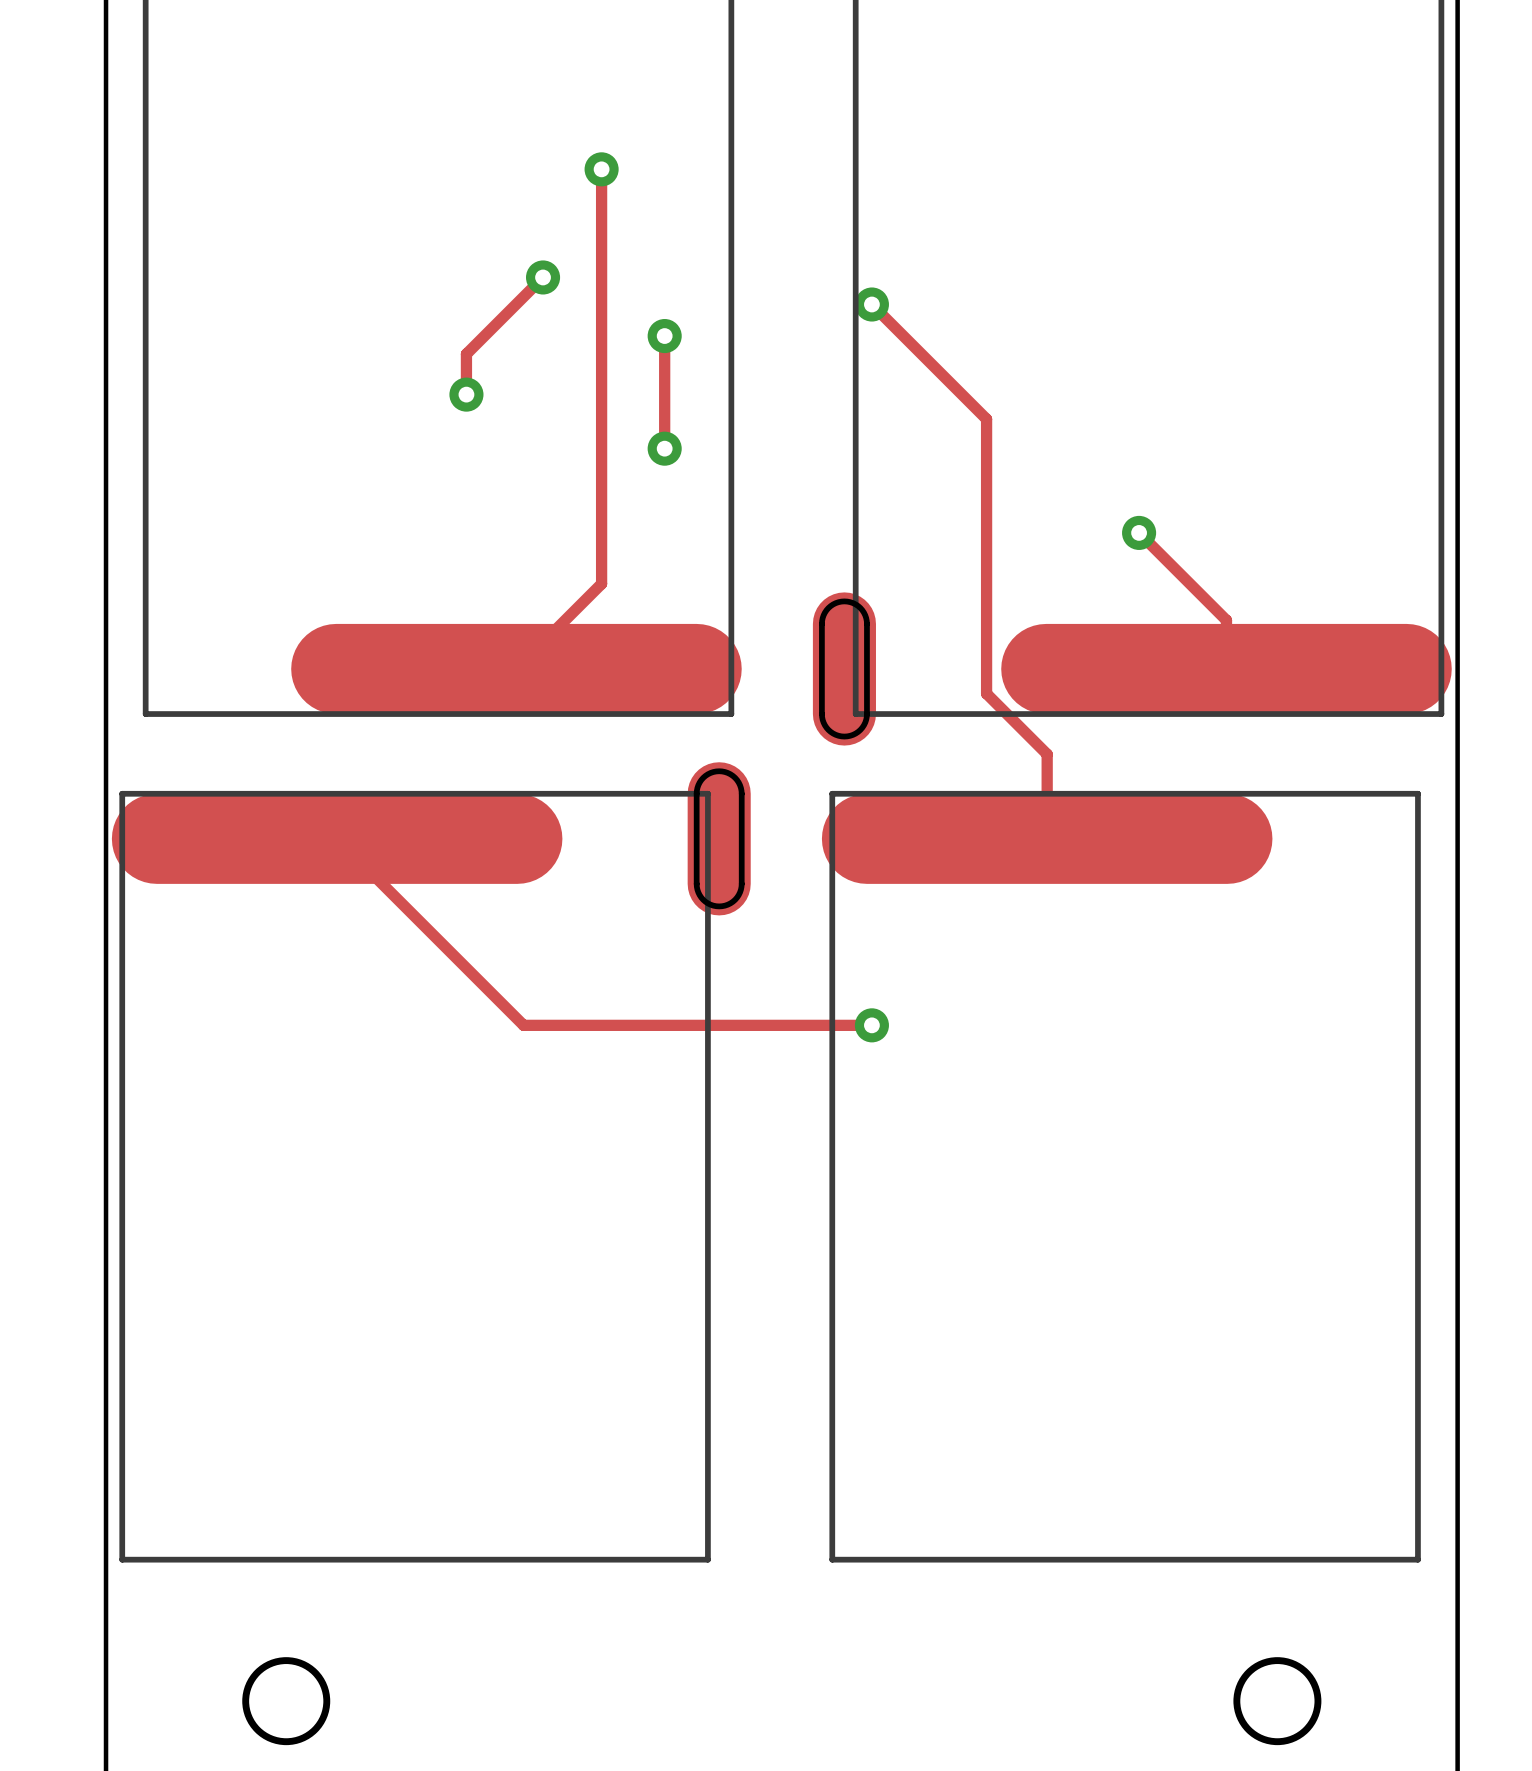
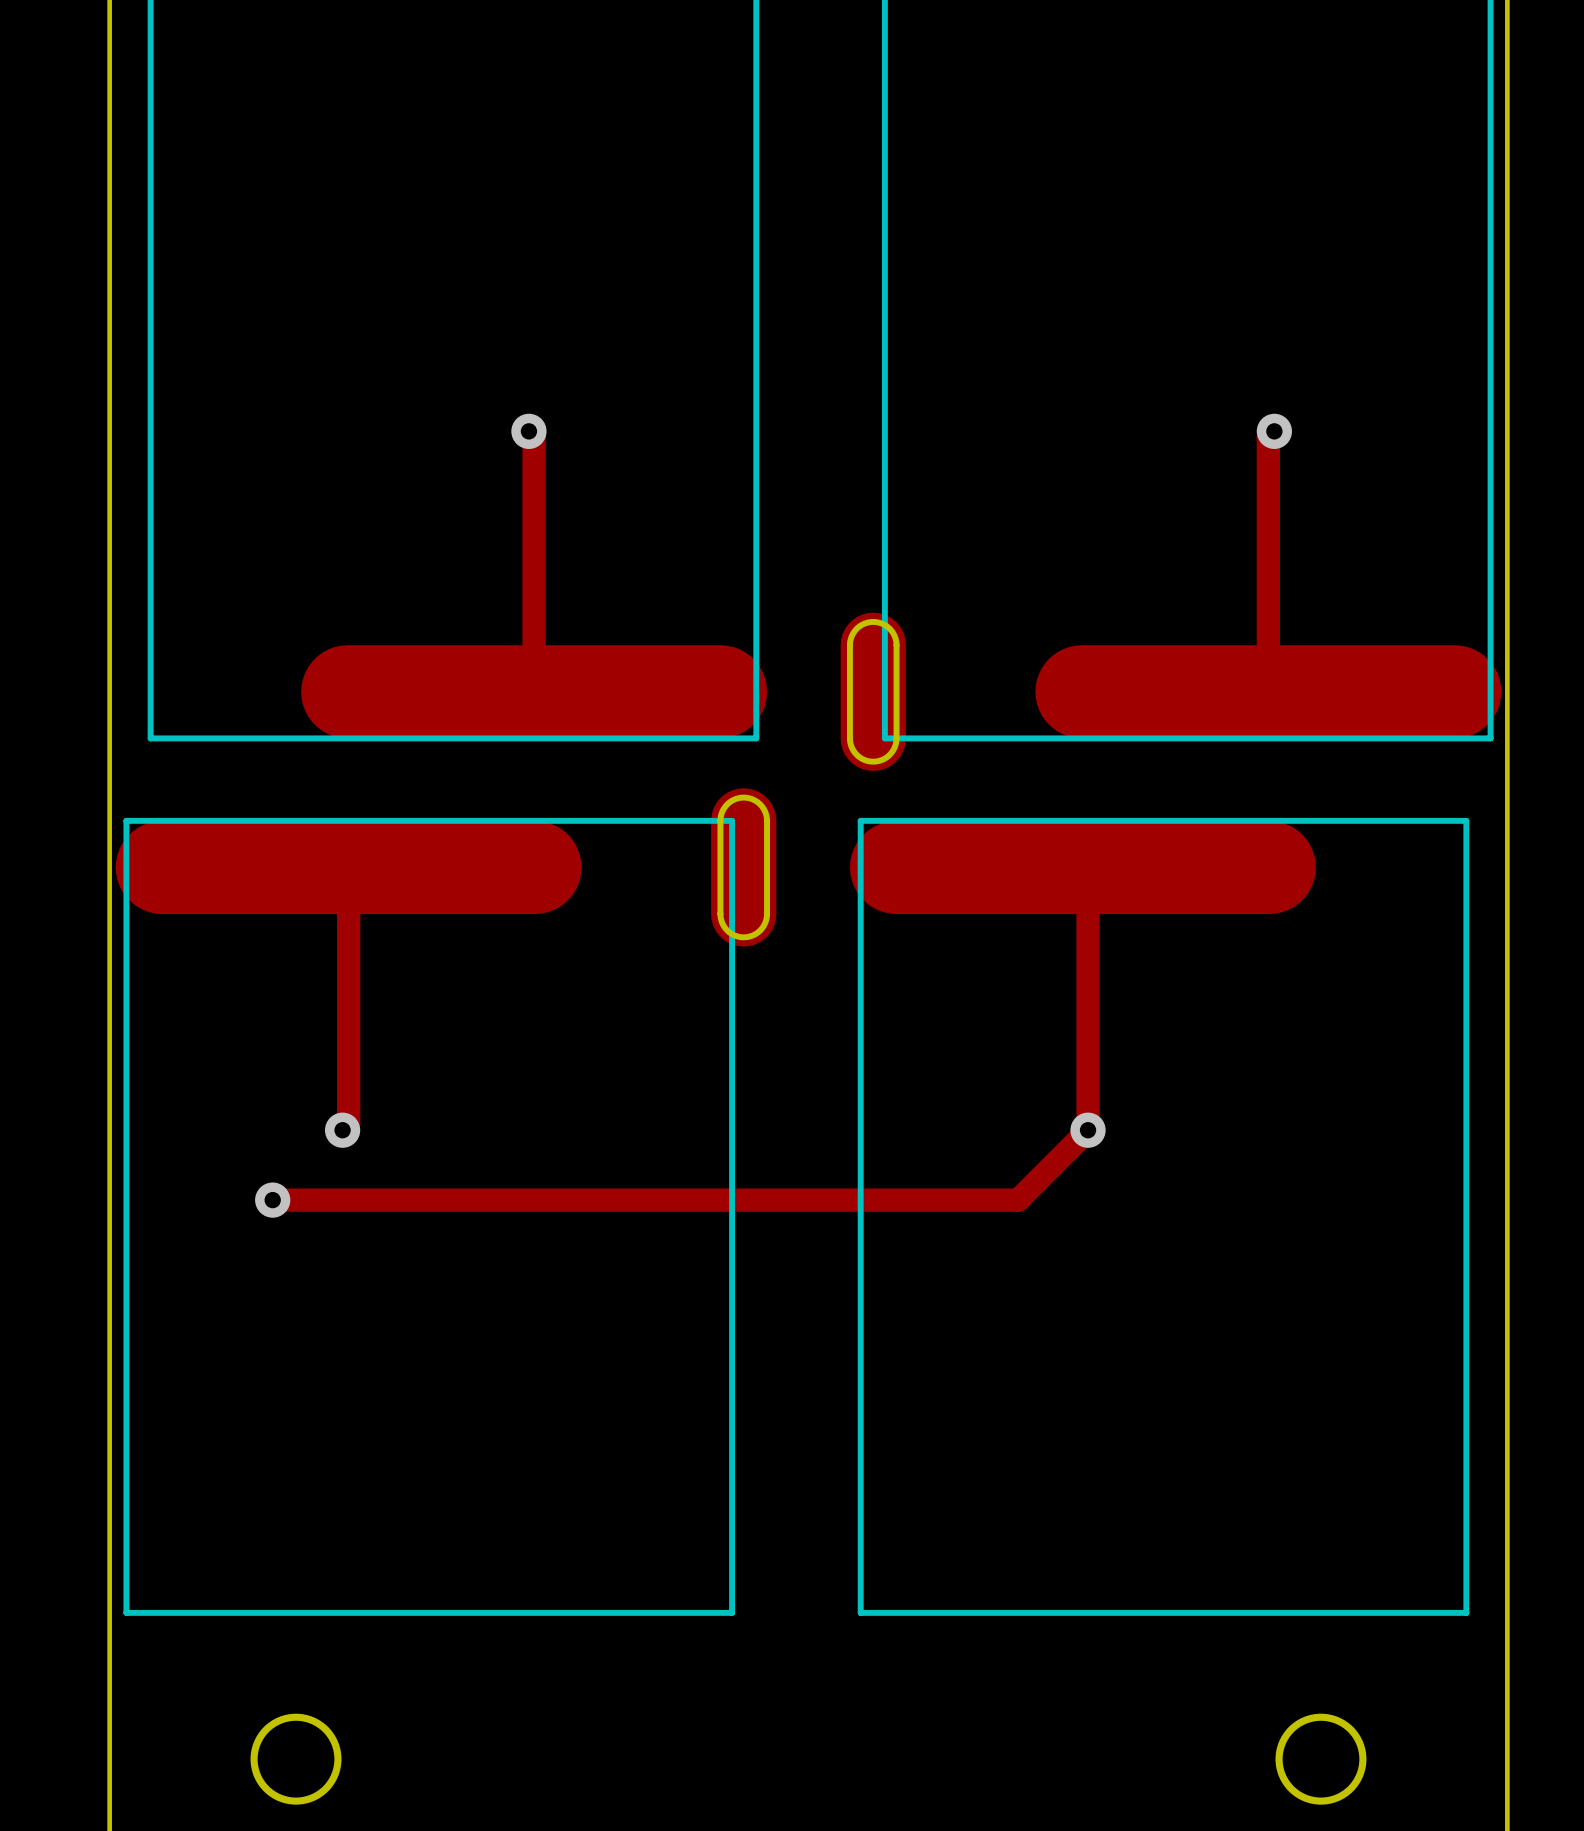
track: (601, 169) (601, 583) (516, 668) -> (528, 431) (534, 436) (534, 691)
via: (601, 169) -> none
track: (543, 277) (466, 354) (466, 394) -> none
via: (543, 277) -> none
track: (871, 304) (986, 419) (986, 693) (1047, 754) (1047, 838) -> (272, 1200) (1018, 1200) (1088, 1130) (1088, 872) (1082, 867)
via: (871, 304) -> none
track: (664, 336) (664, 448) -> none
via: (664, 336) -> none
via position: (466, 394) -> (528, 431)
via: (664, 448) -> none
track: (1139, 532) (1226, 620) -> (1274, 431) (1268, 437) (1268, 641)
via position: (1139, 532) -> (1274, 431)
track: (337, 838) (523, 1025) (871, 1025) -> (348, 867) (348, 1124) (342, 1130)
via position: (871, 1025) -> (1088, 1130)
via: none -> (342, 1130)
via: none -> (272, 1200)

